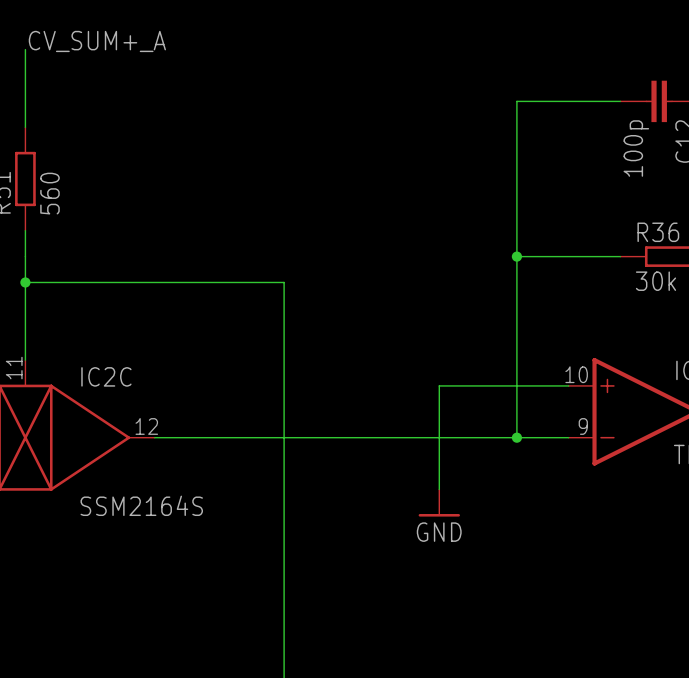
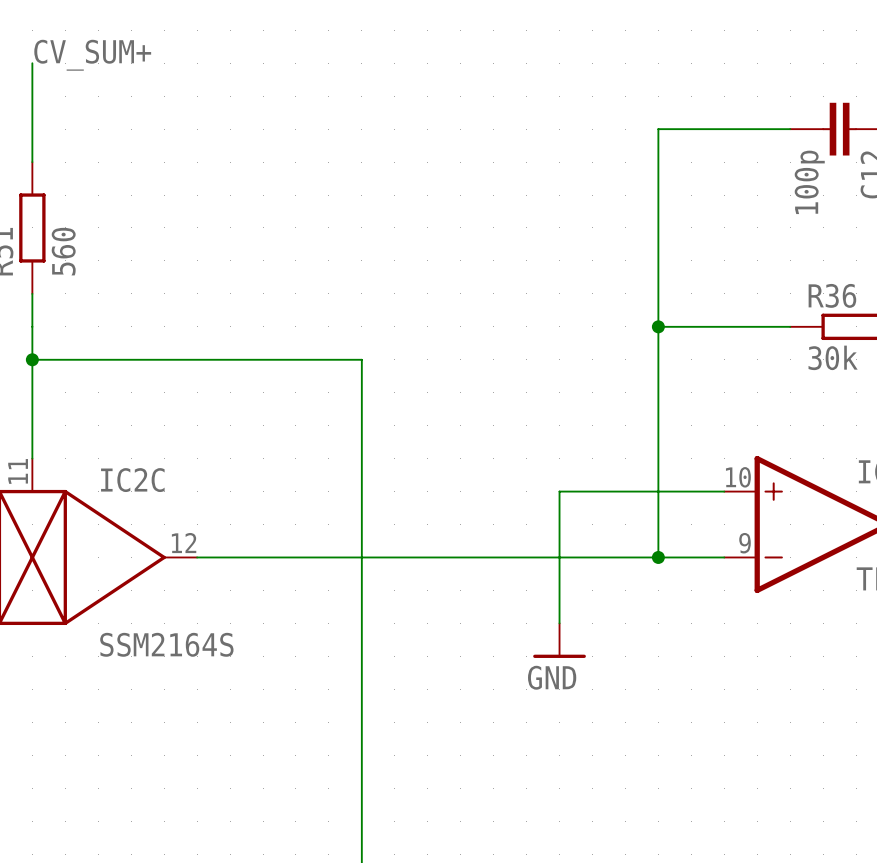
label: CV_SUM+_A (97, 41) -> CV_SUM+ (92, 55)

